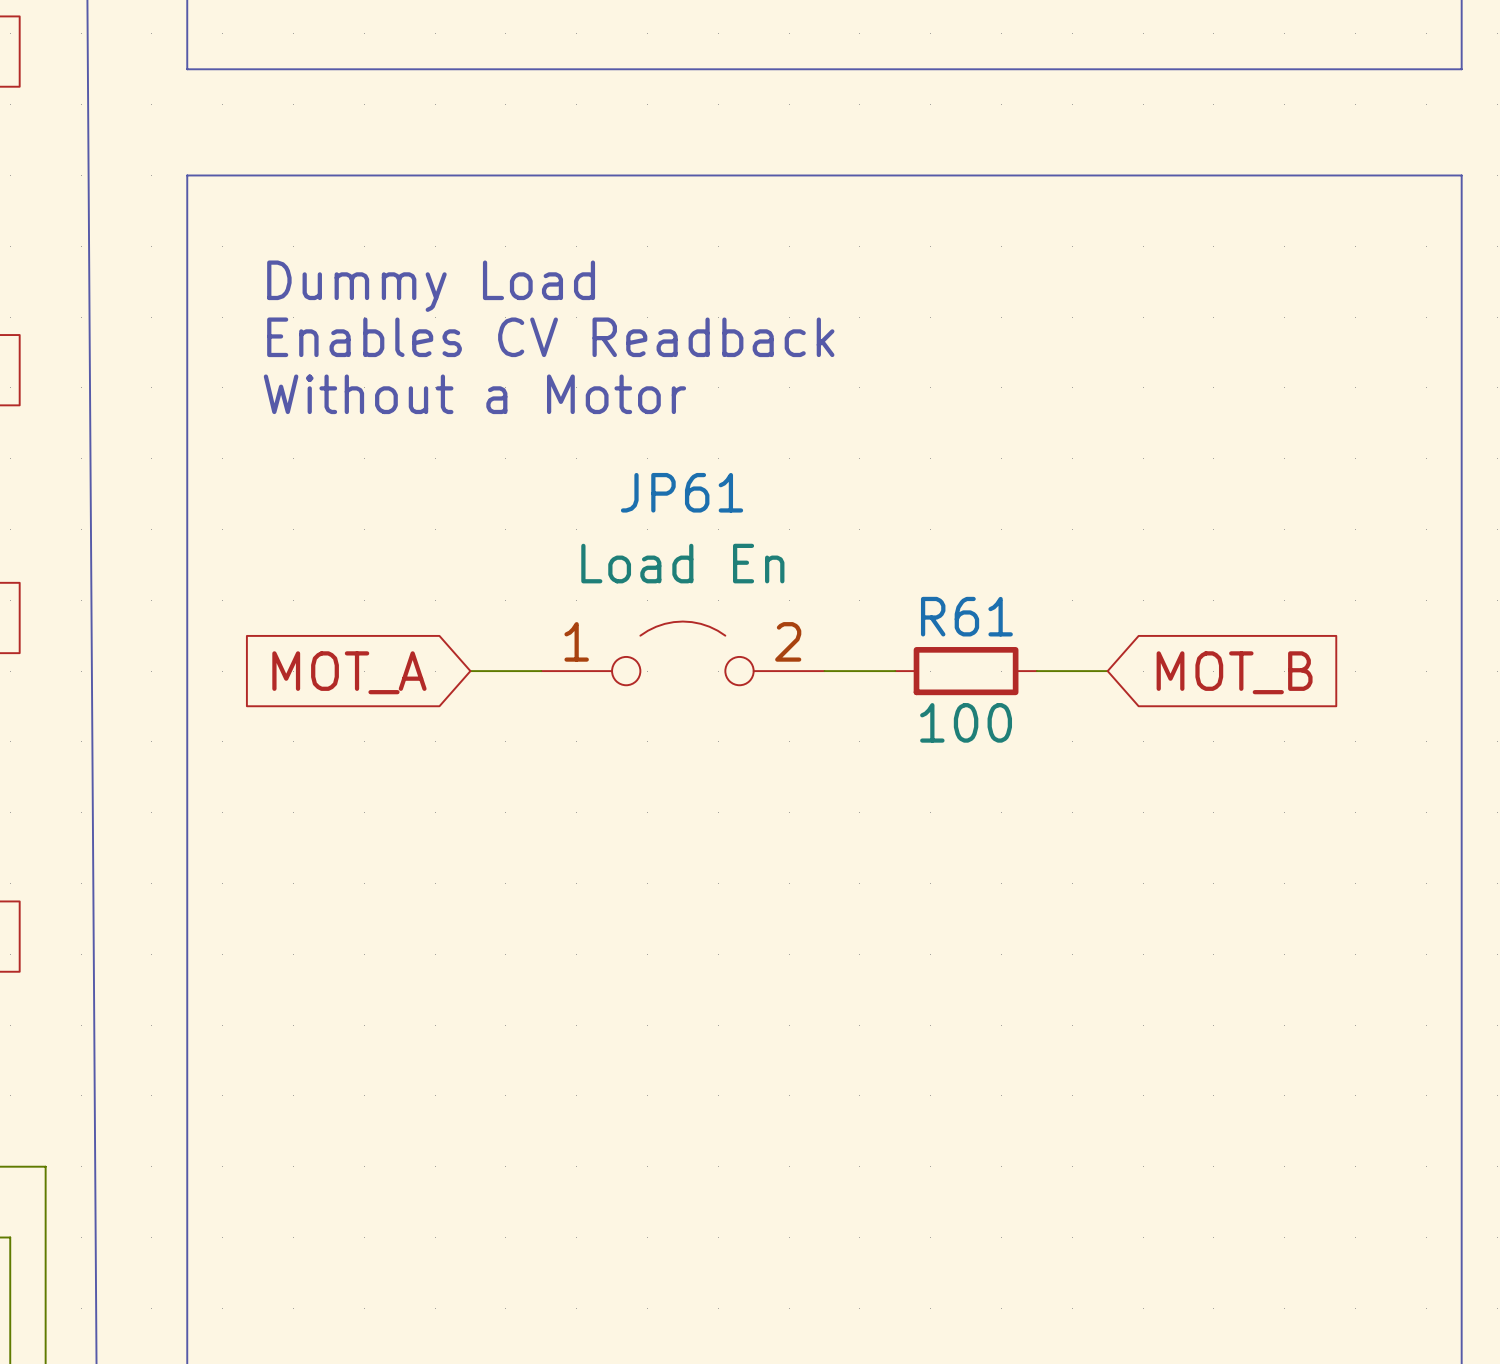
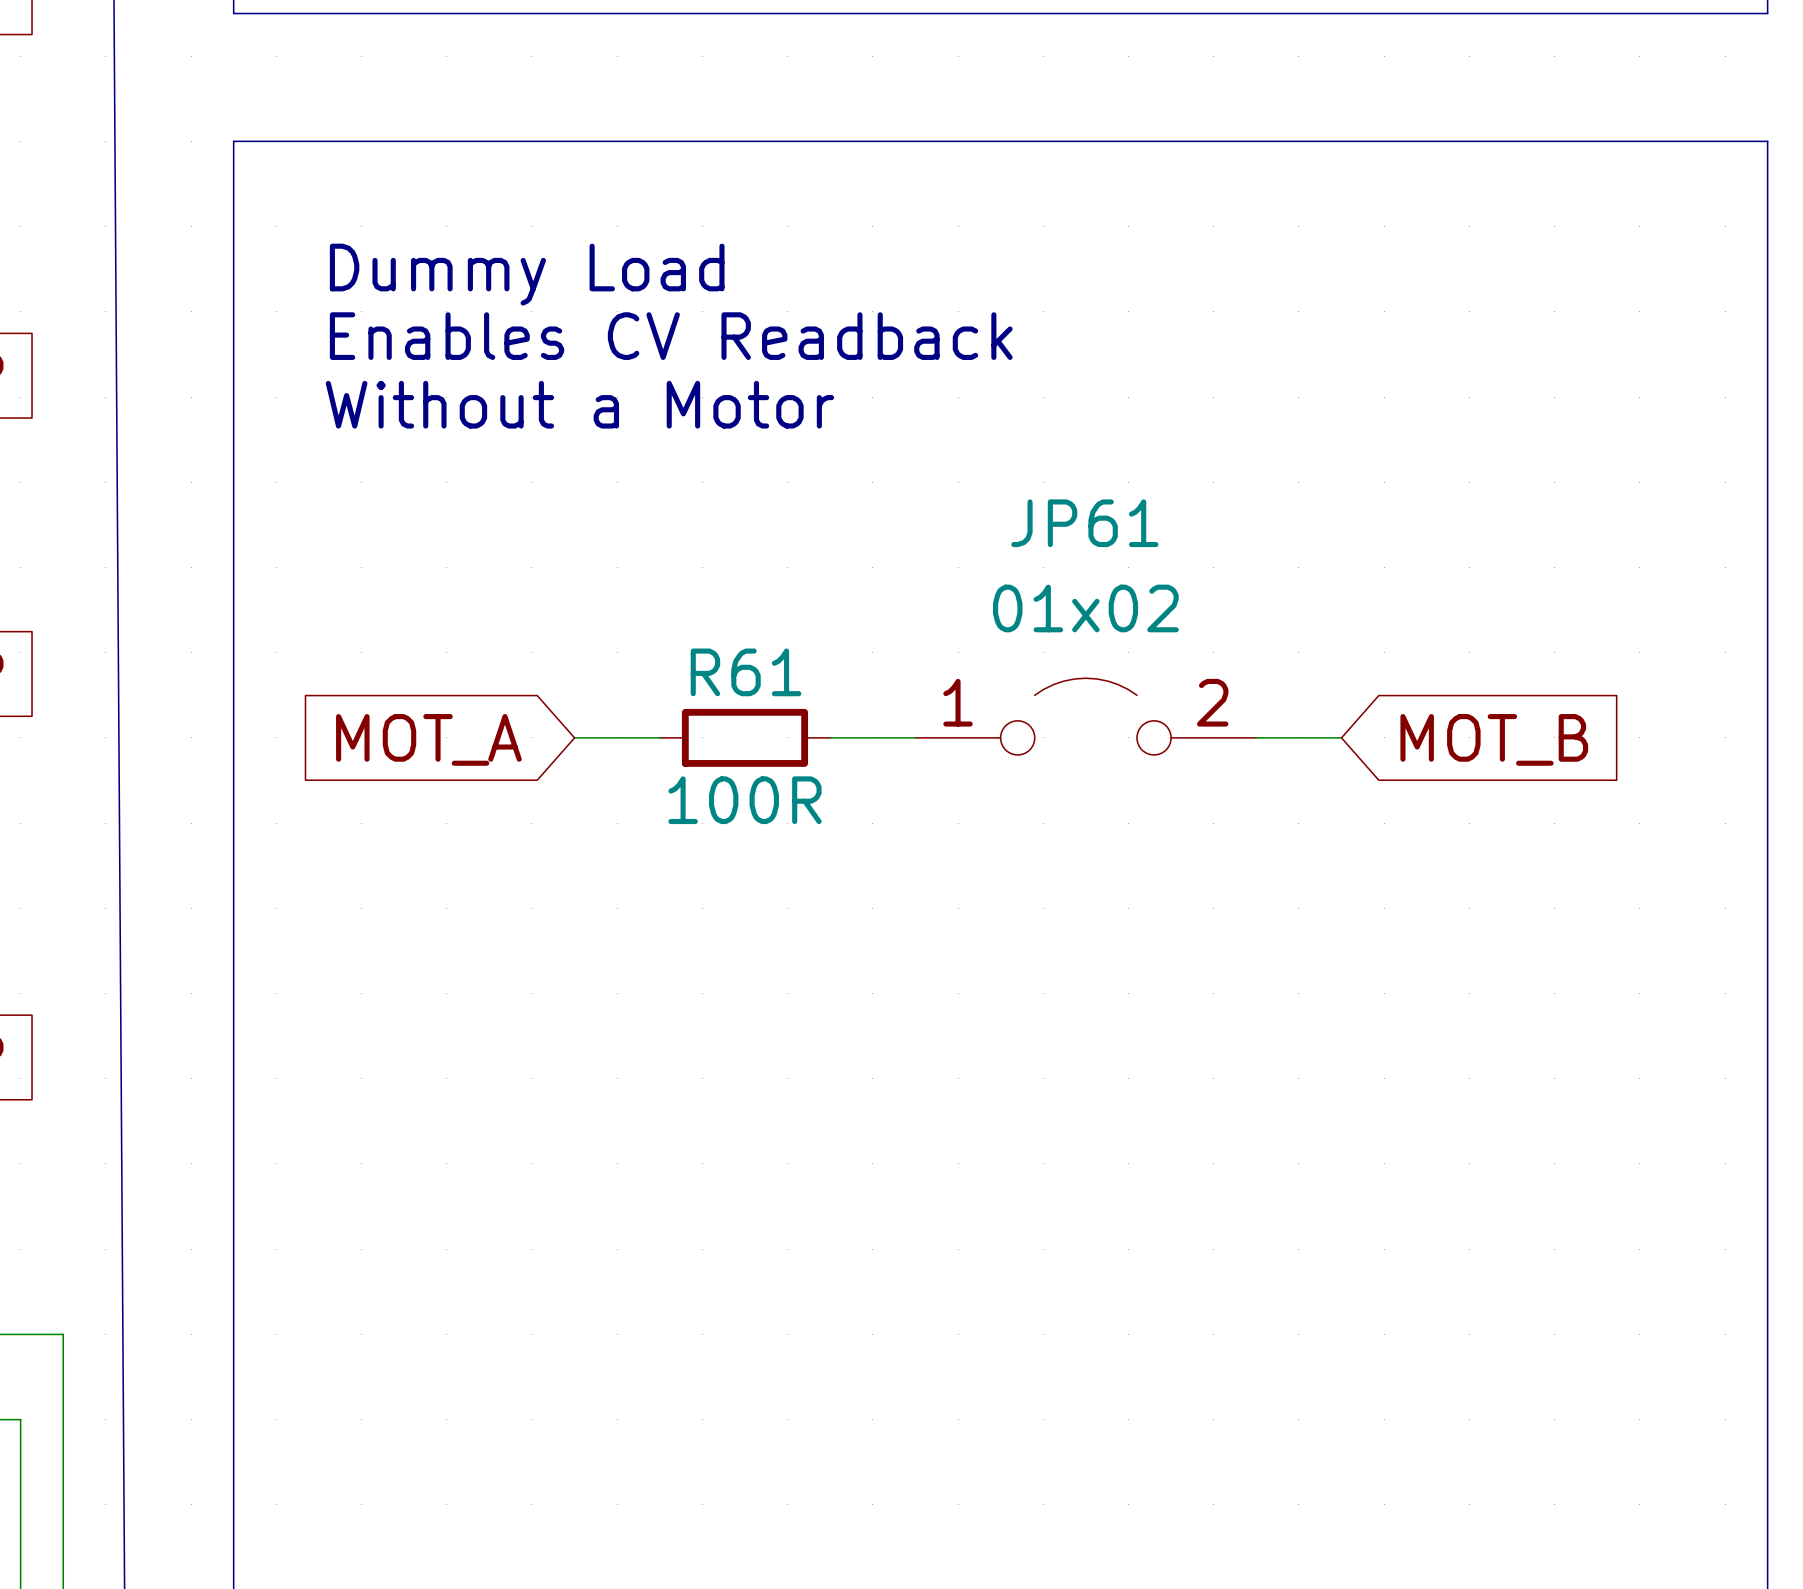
JP61 value: Load En (682, 563) -> 01x02 (1085, 608)
JP61 position: (682, 653) -> (1085, 716)
wire: (824, 671) (895, 671) -> (830, 737) (915, 737)
R61 position: (966, 671) -> (744, 737)
R61 value: 100 (966, 722) -> 100R (744, 800)

